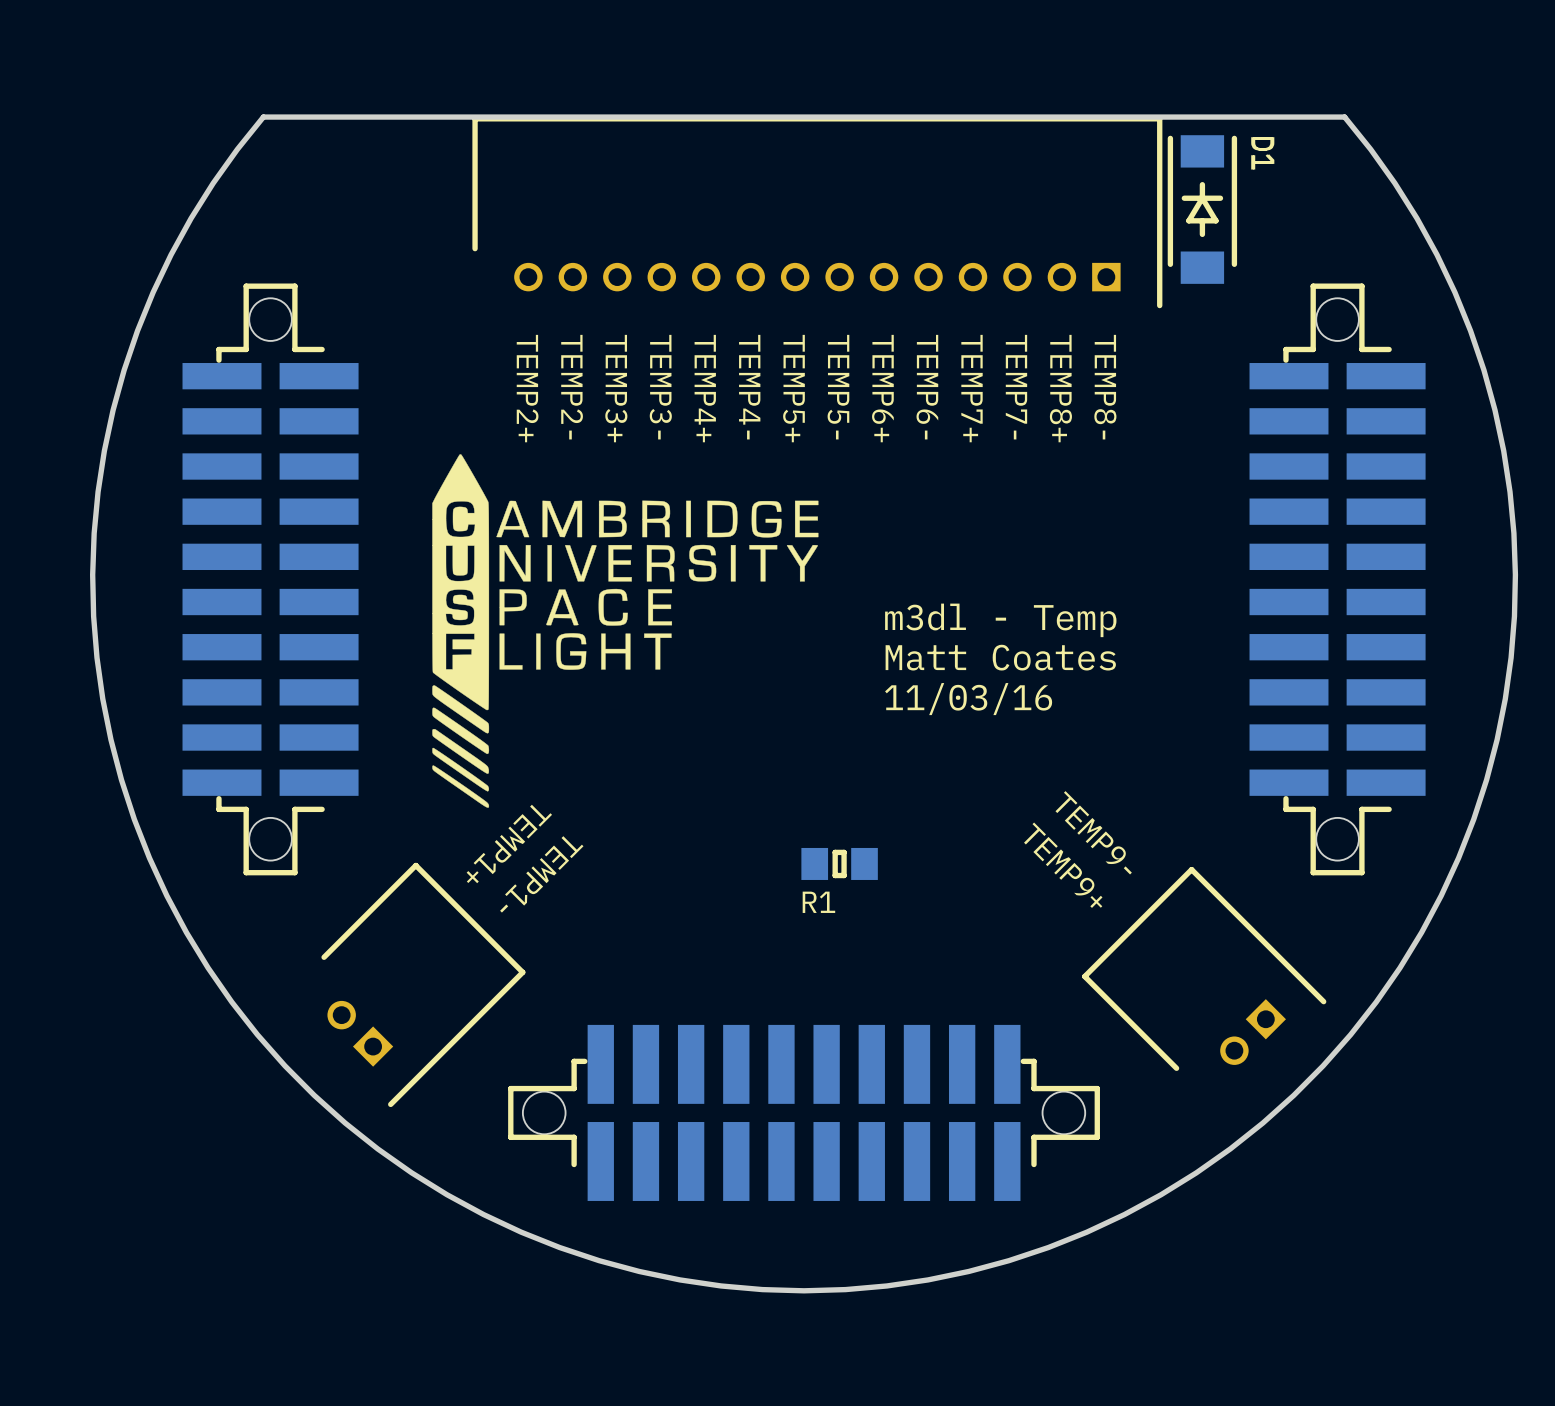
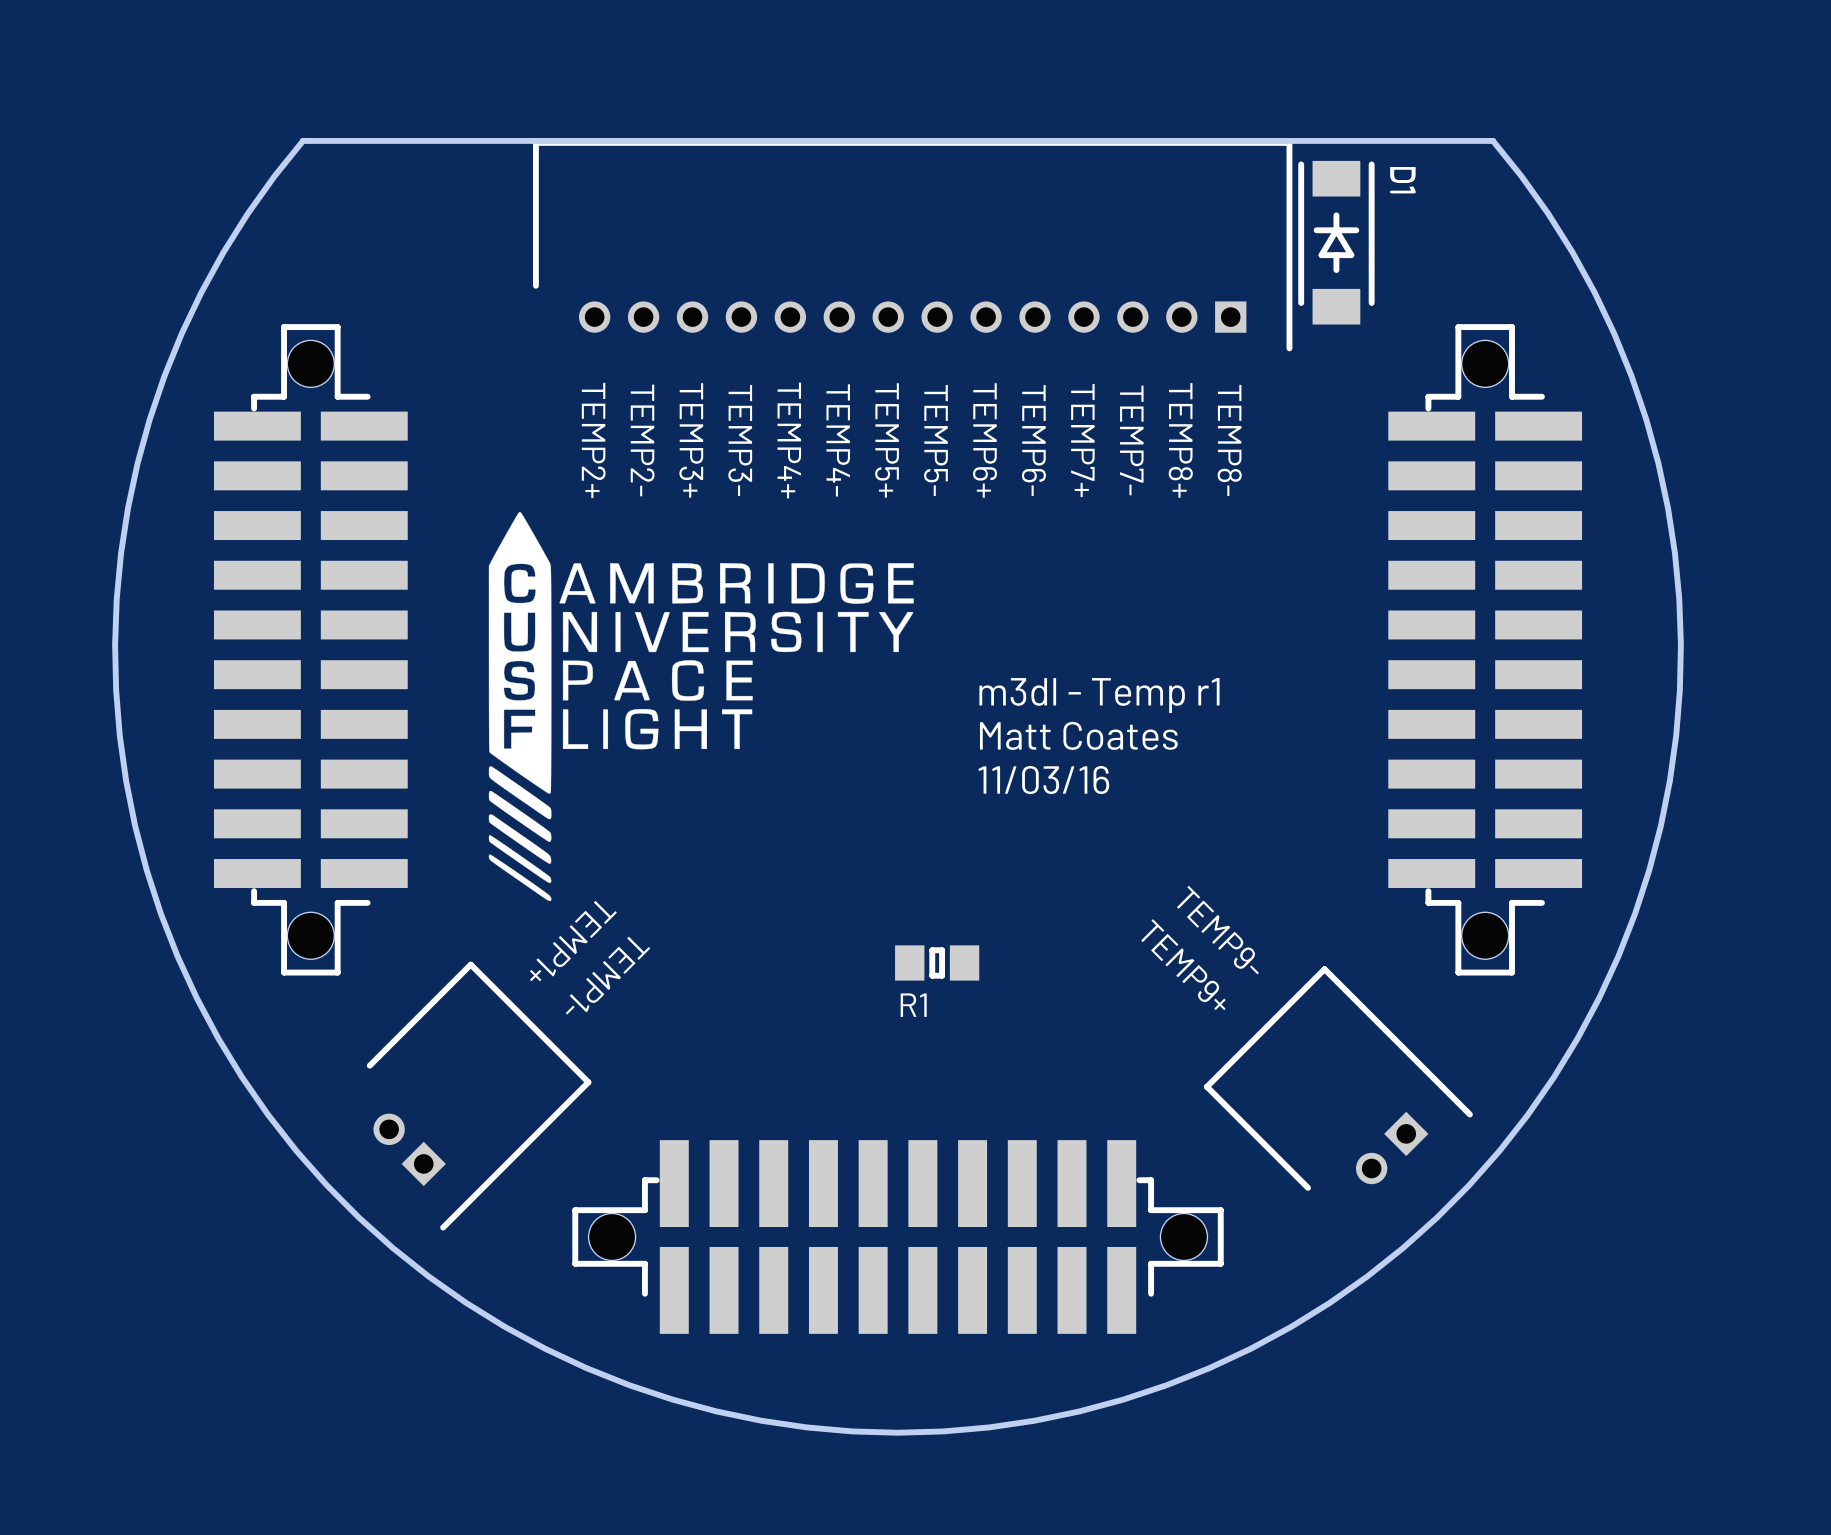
text: m3dl - Temp (1000, 620) -> m3dl - Temp r1 (1099, 695)
text position: Matt Coates (1000, 657) -> Matt Coates (1078, 735)
text position: 11/03/16 (968, 699) -> 11/03/16 (1043, 780)

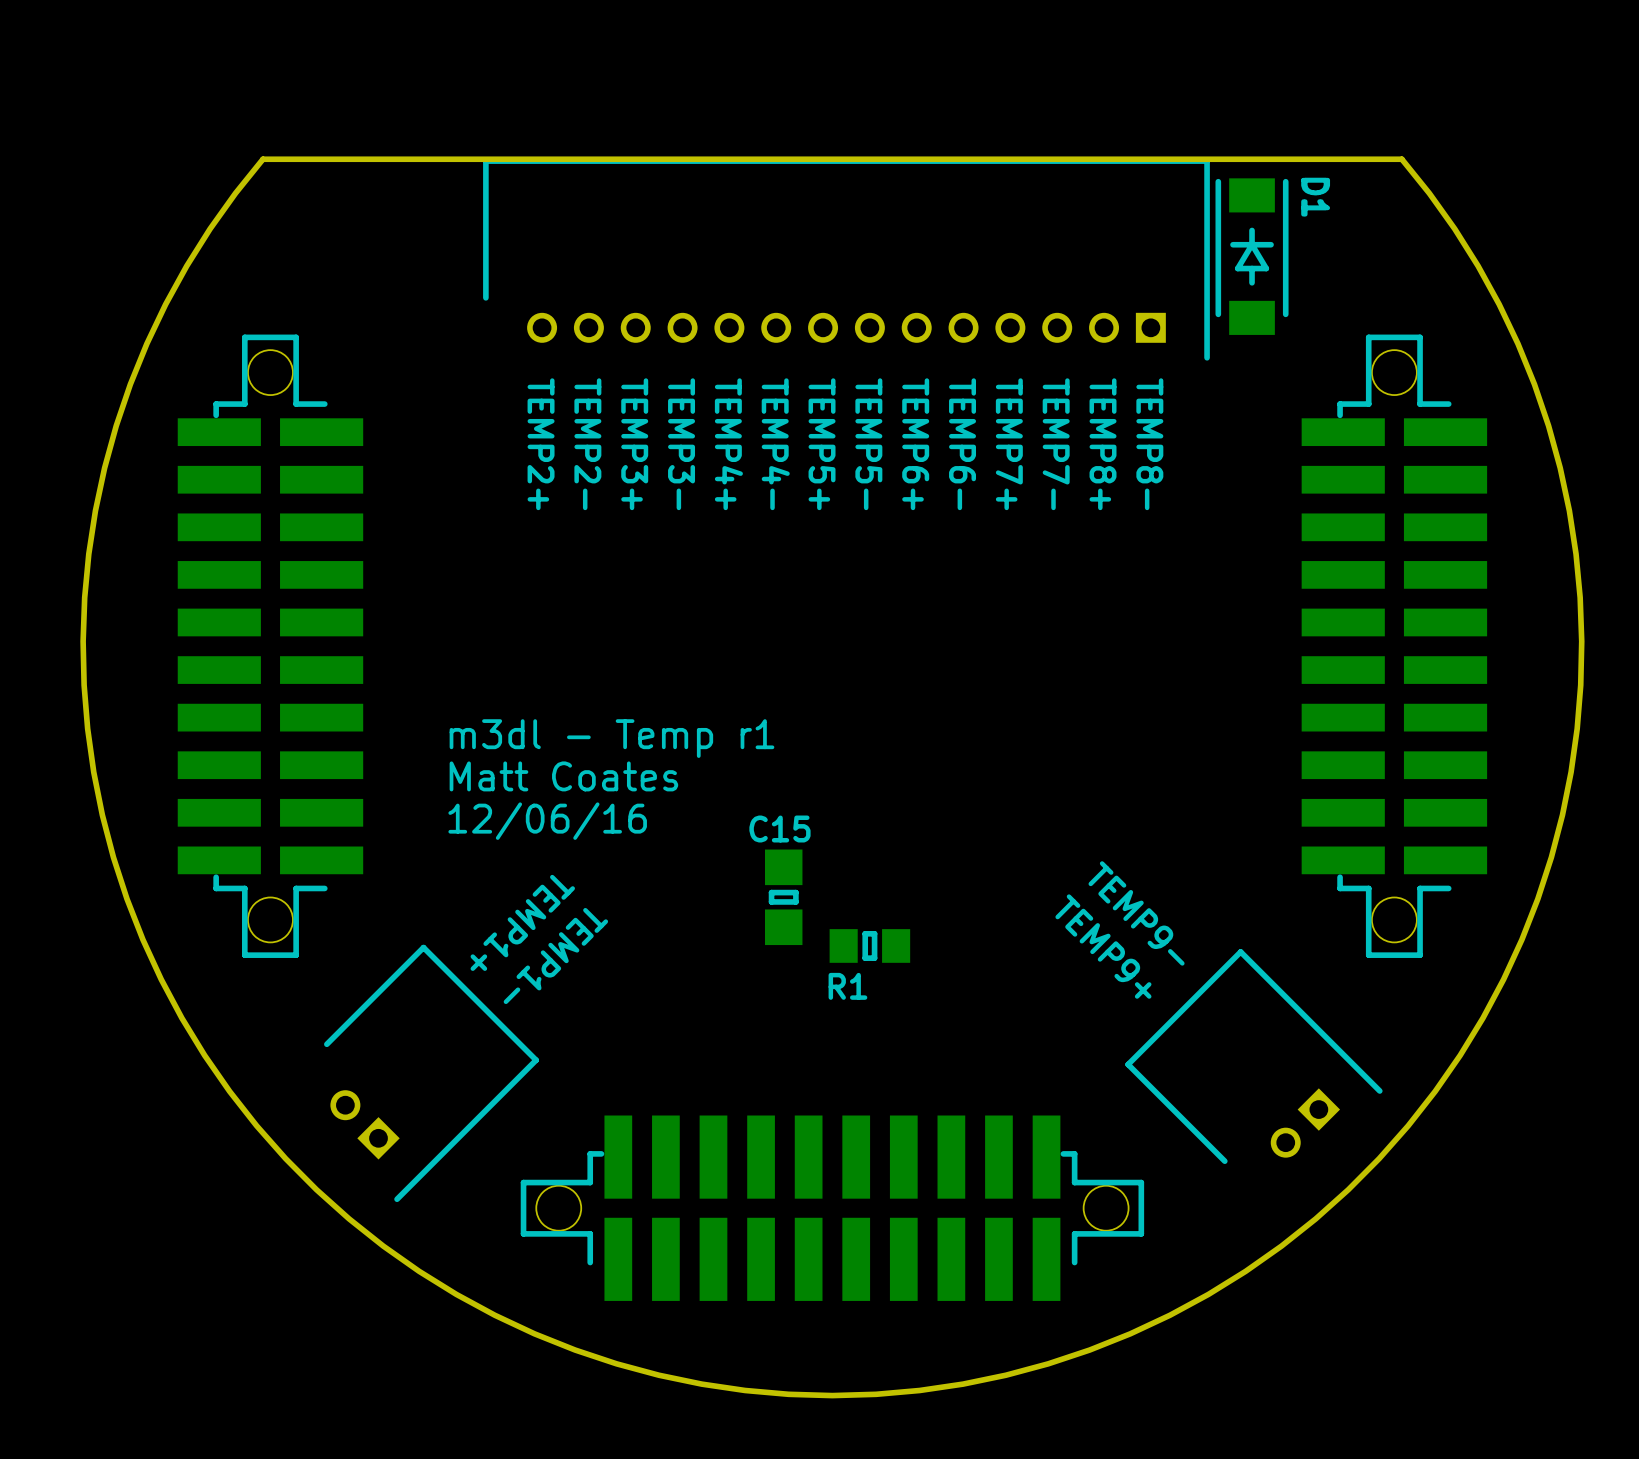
drawing: [488, 512, 914, 902] -> none
text position: m3dl - Temp r1 (1099, 695) -> m3dl - Temp r1 (611, 738)
text position: Matt Coates (1078, 735) -> Matt Coates (563, 776)
text: 11/03/16 (1043, 780) -> none
text: none -> 12/06/16 (547, 821)
text: none -> C15 (779, 829)
part: none -> (783, 897)

